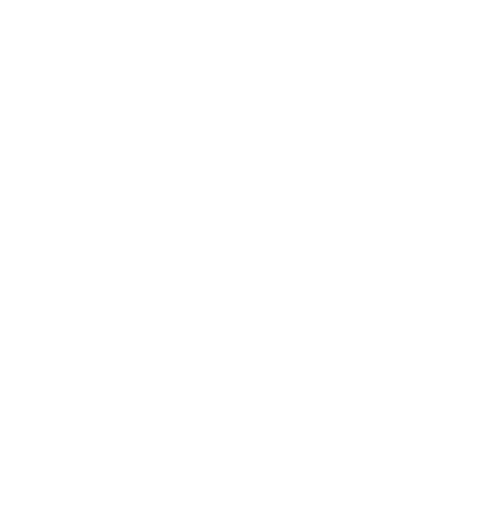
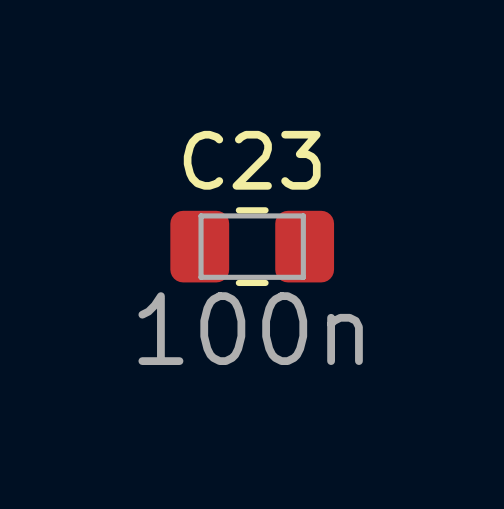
C23: none -> 100n (252, 246)

